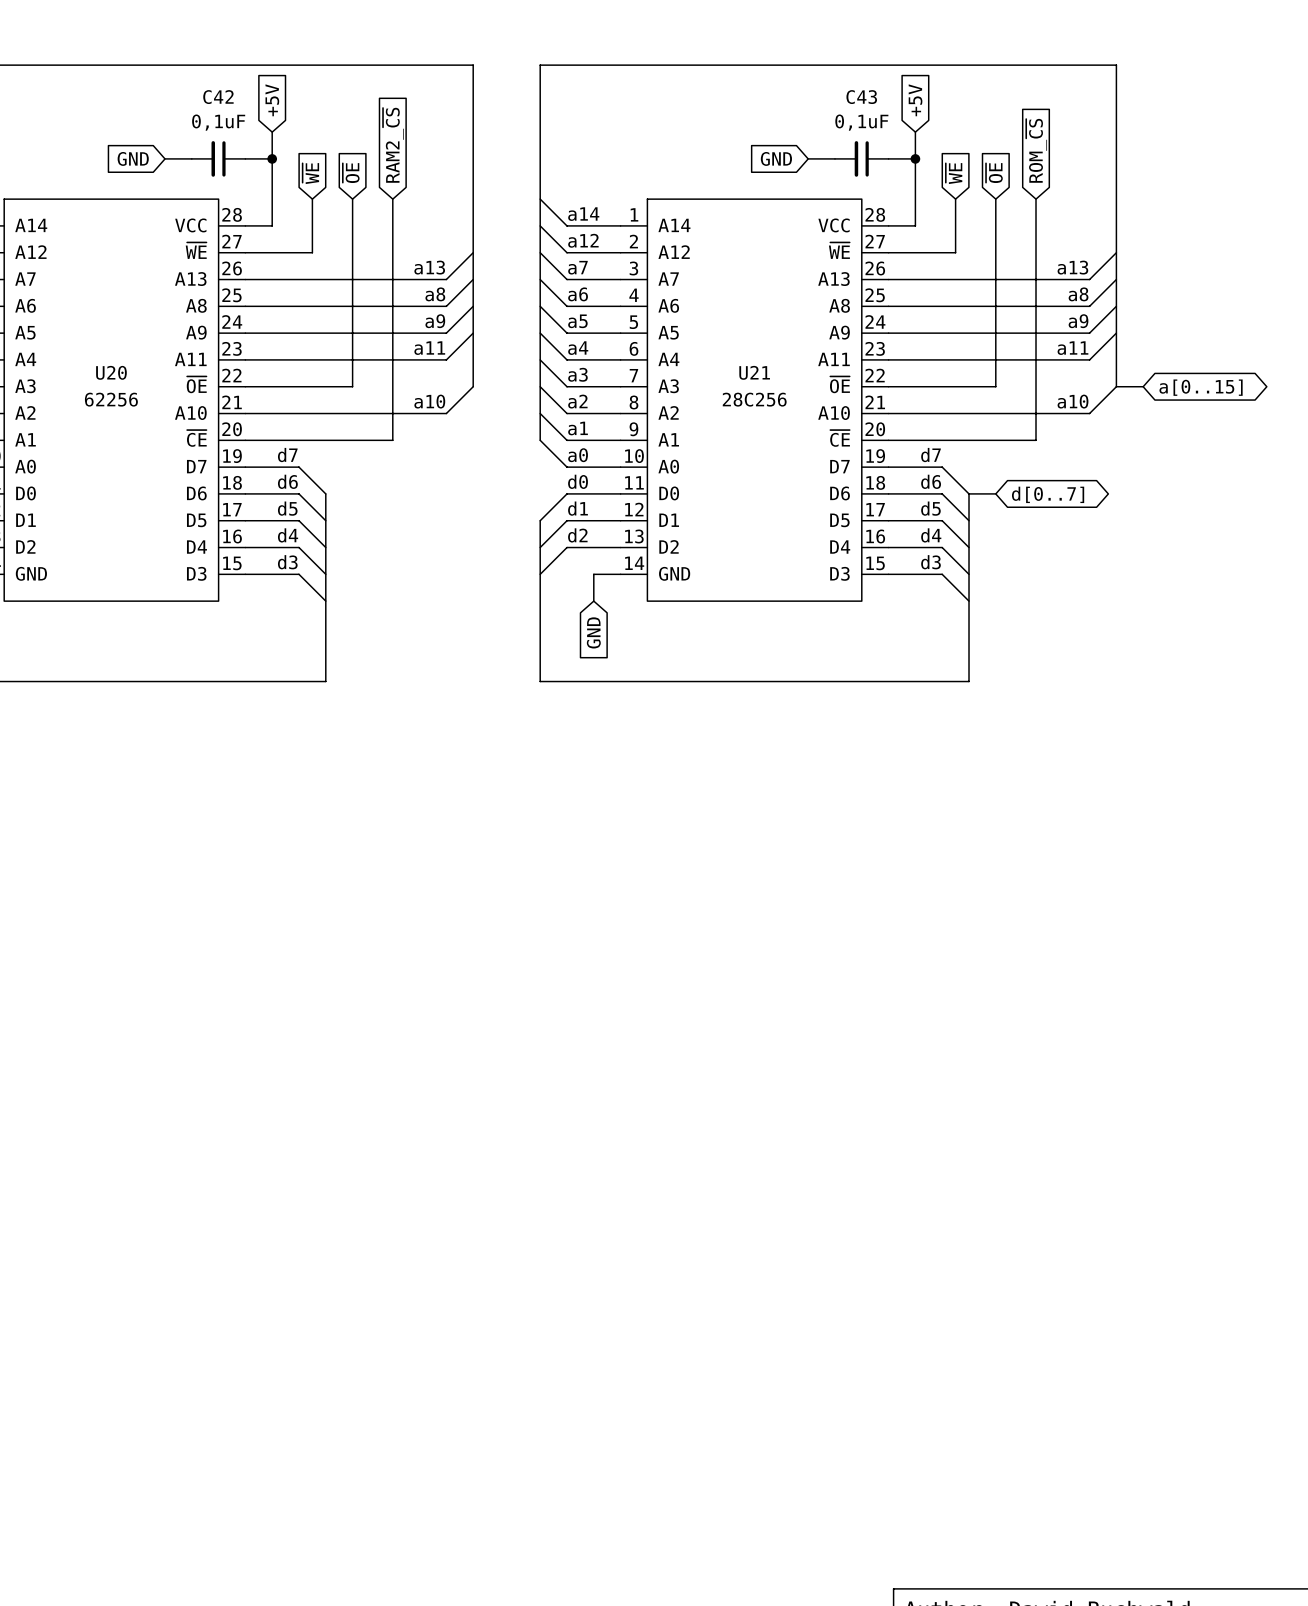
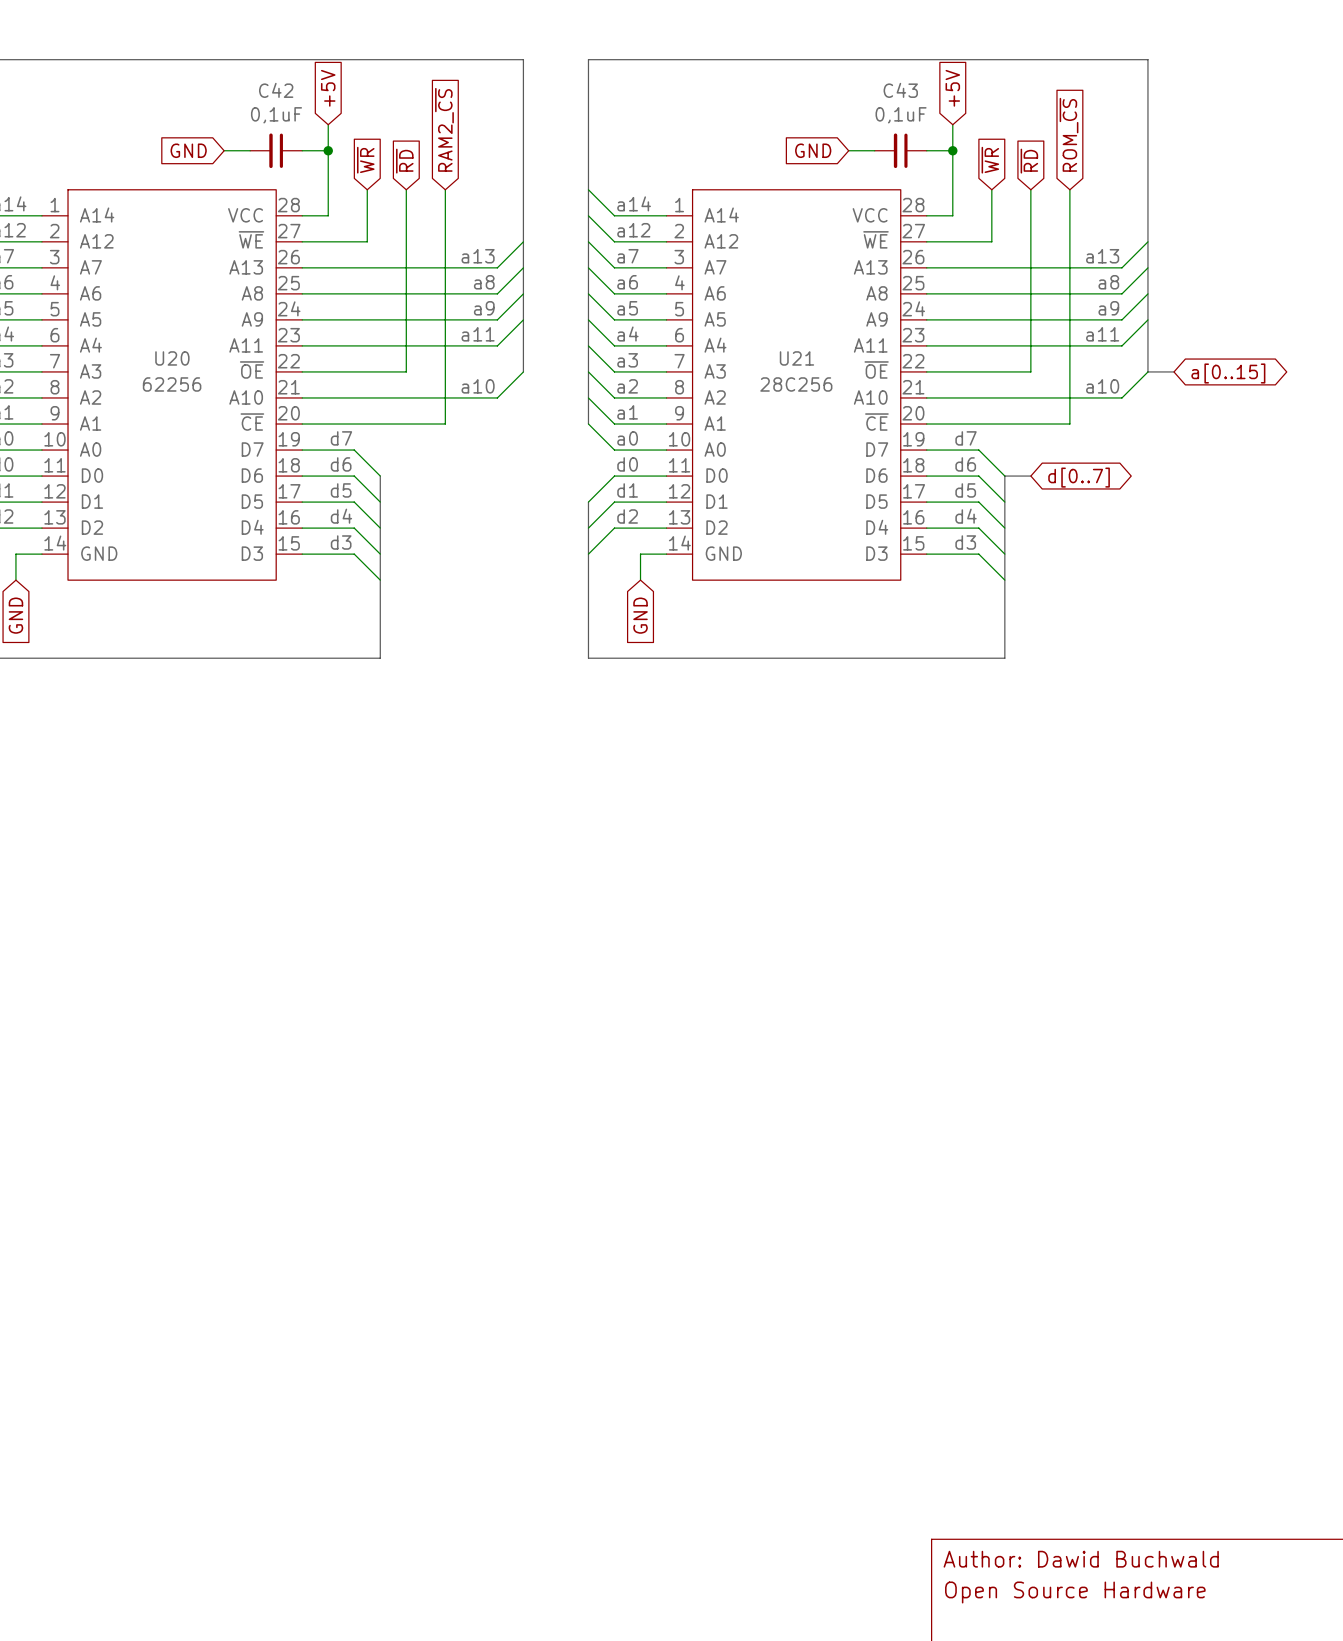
global label: ~{WE} (310, 173) -> ~{WR} (365, 160)
global label: ~{OE} (351, 173) -> ~{RD} (404, 161)
global label: ~{WE} (954, 173) -> ~{WR} (990, 160)
global label: ~{OE} (994, 173) -> ~{RD} (1029, 161)

